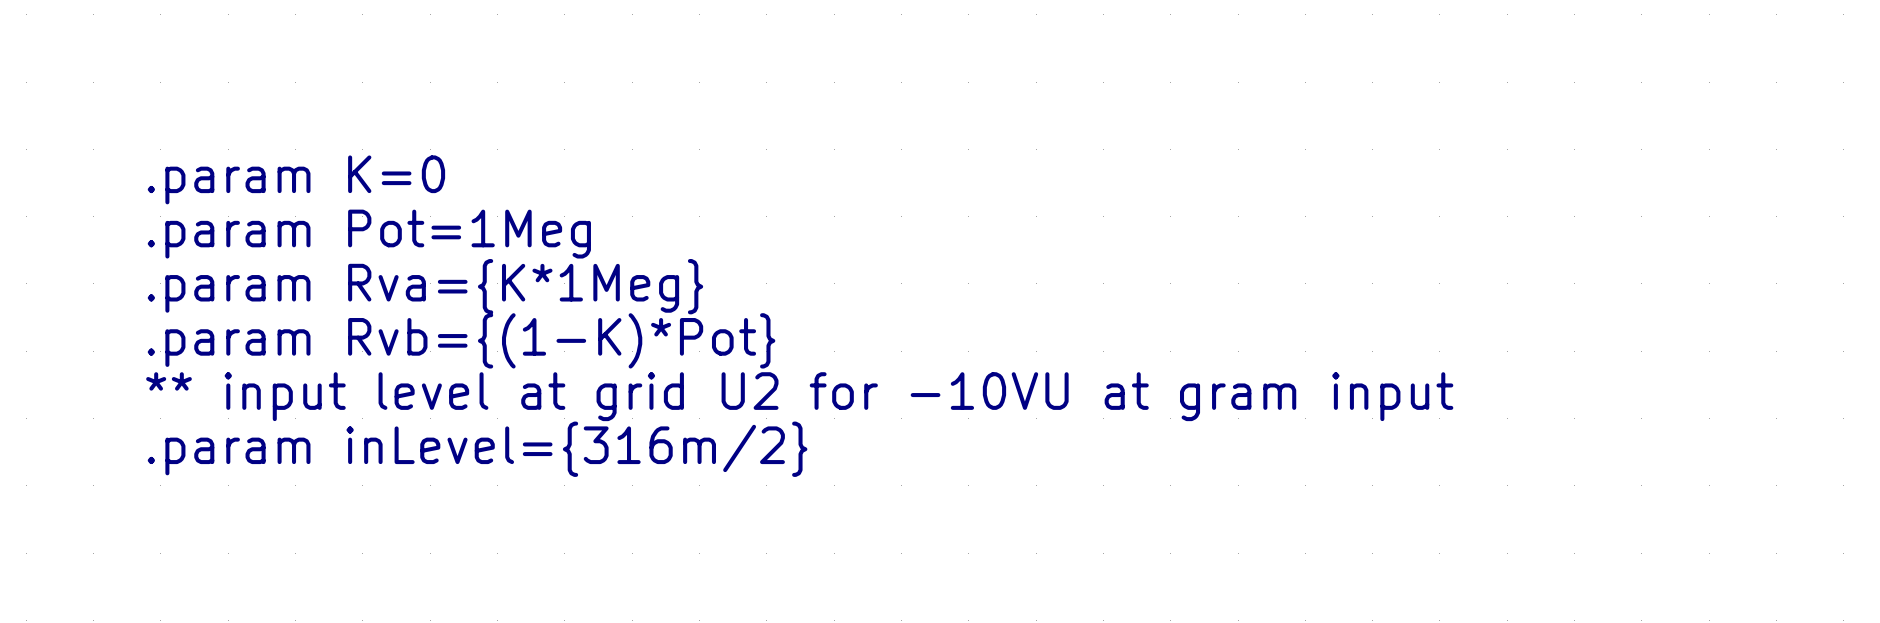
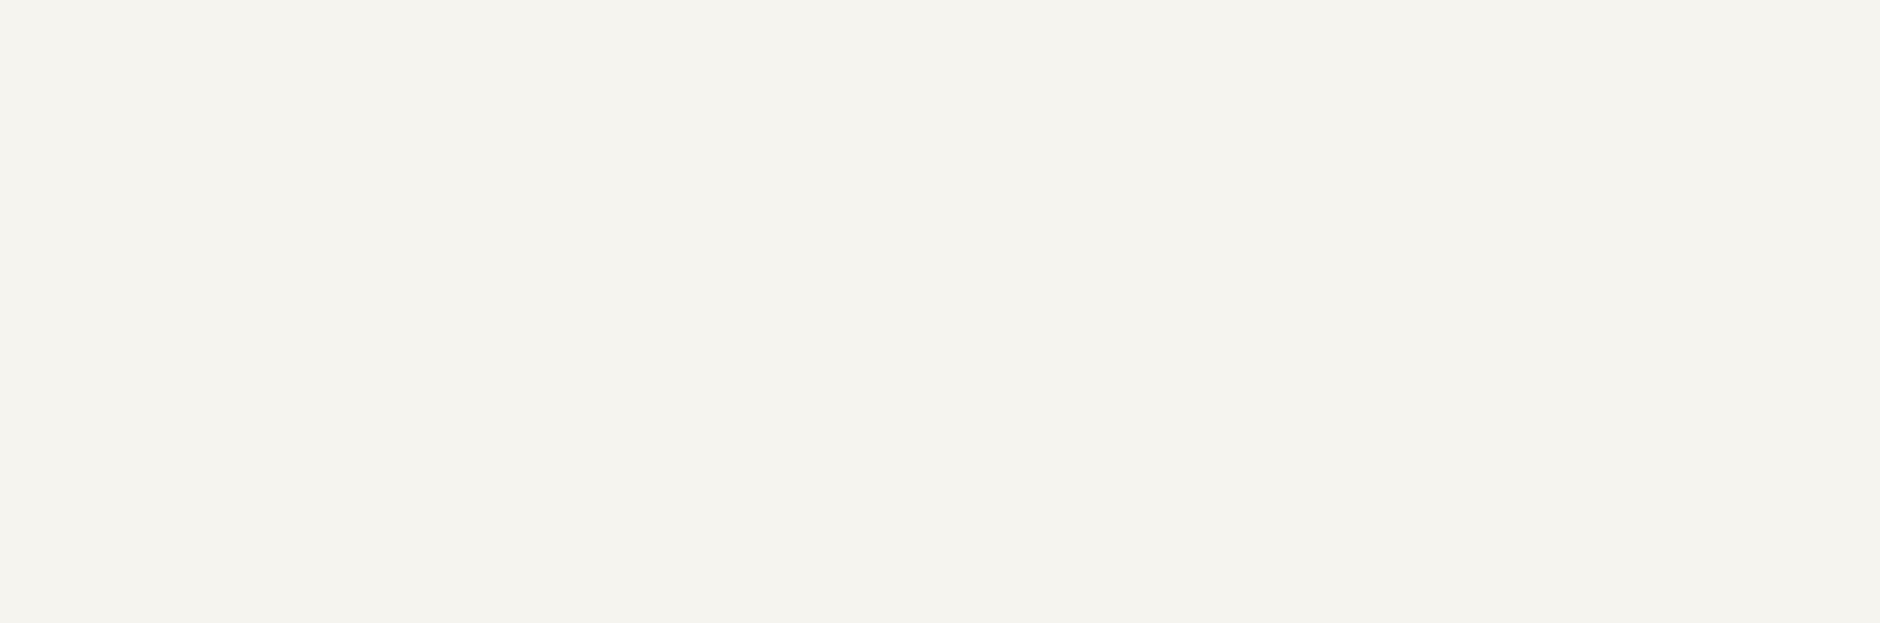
text: .param K=0 (296, 179) -> none
text: .param Pot=1Meg (369, 234) -> none
text: .param Rva={K*1Meg} (425, 286) -> none
text: .param Rvb={(1-K)*Pot} (461, 340) -> none
text: ** input level at grid U2 for -10VU at gram input (799, 396) -> none
text: .param inLevel={316m/2} (477, 449) -> none

